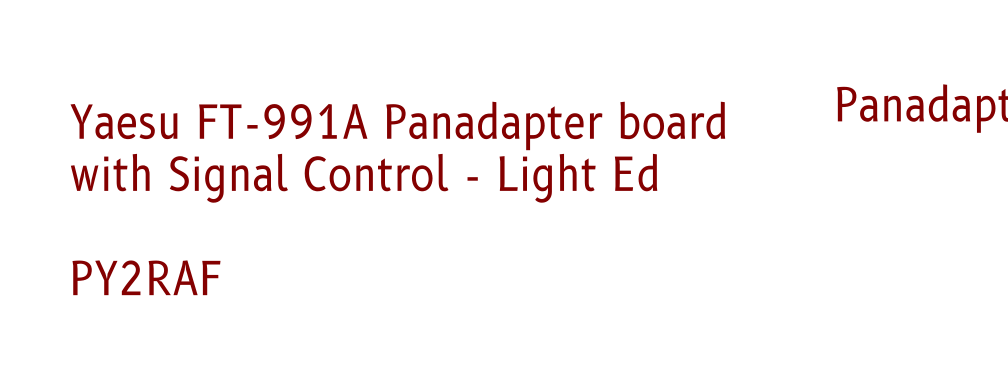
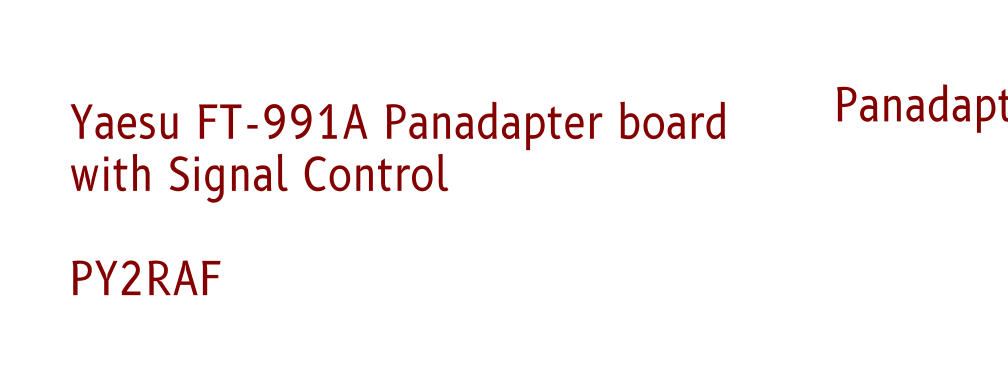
text: with Signal Control - Light Ed (364, 178) -> with Signal Control (259, 178)

